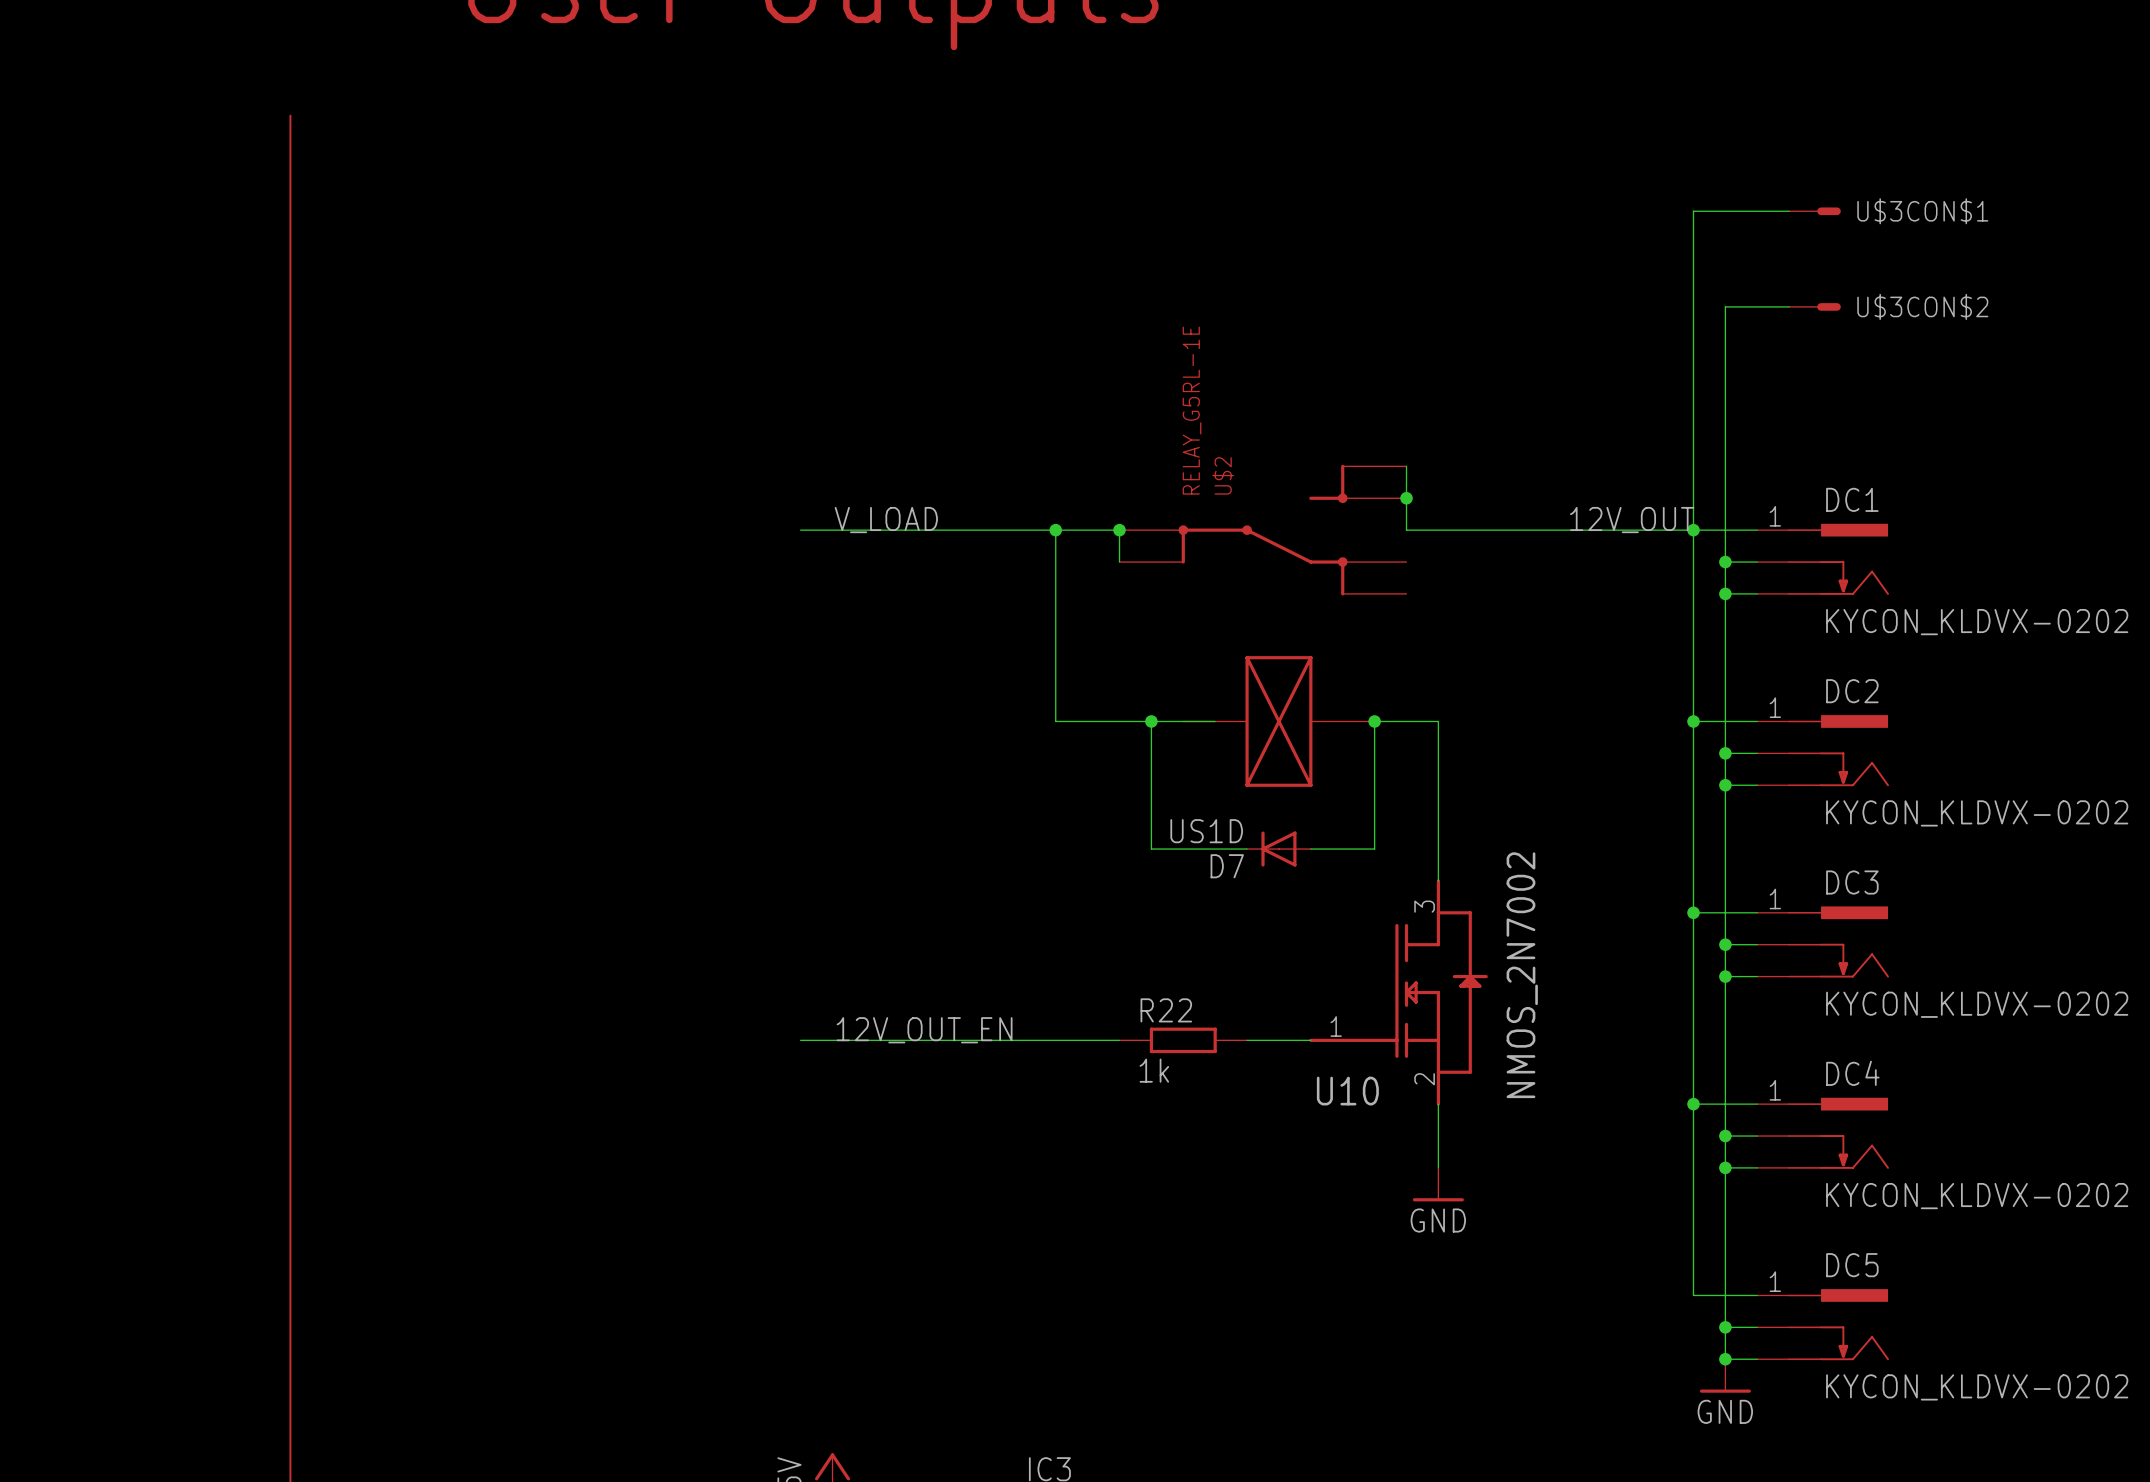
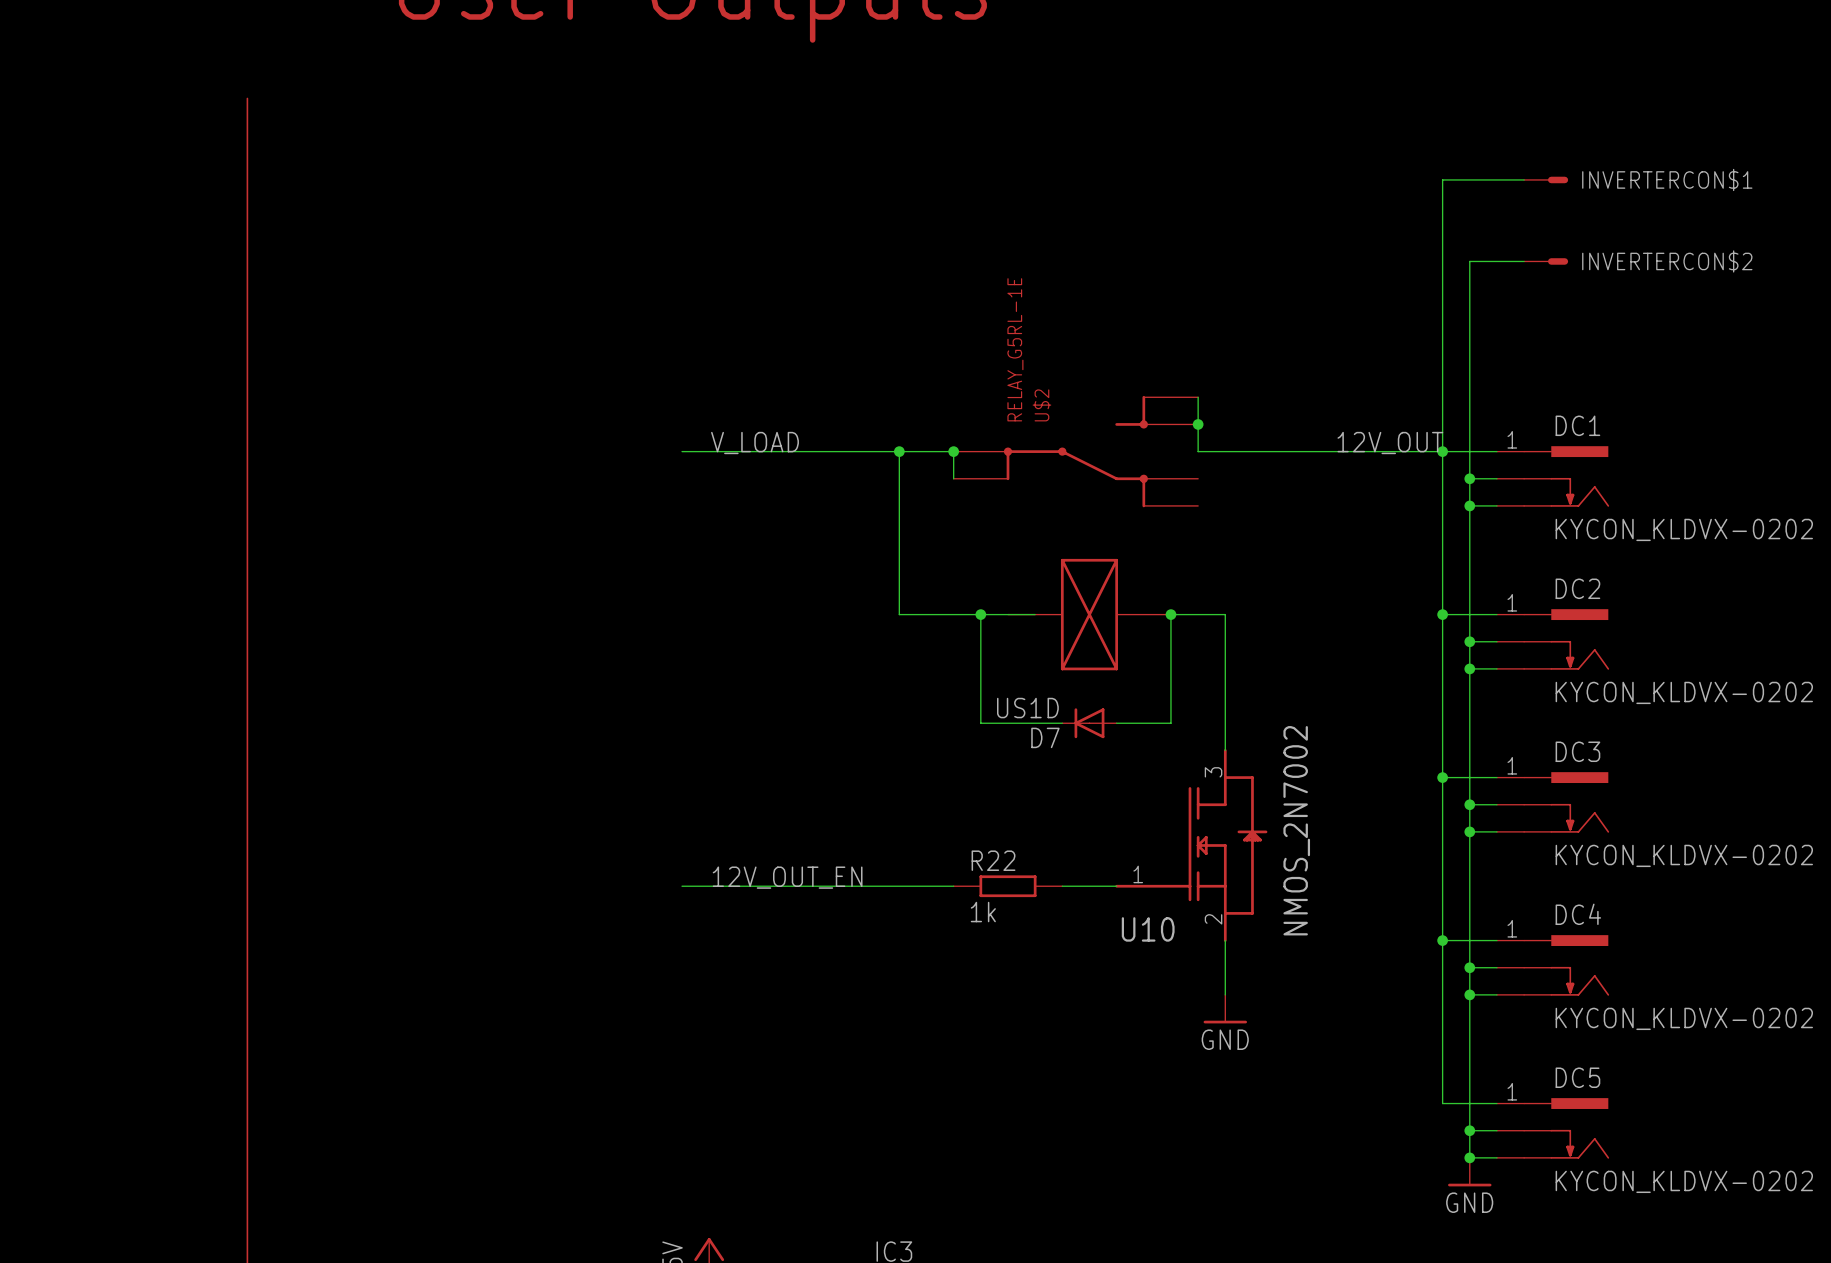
U$3CON$1 name: U$3CON$1 (1922, 211) -> INVERTERCON$1 (1667, 179)
U$3CON$2 name: U$3CON$2 (1922, 306) -> INVERTERCON$2 (1667, 261)

